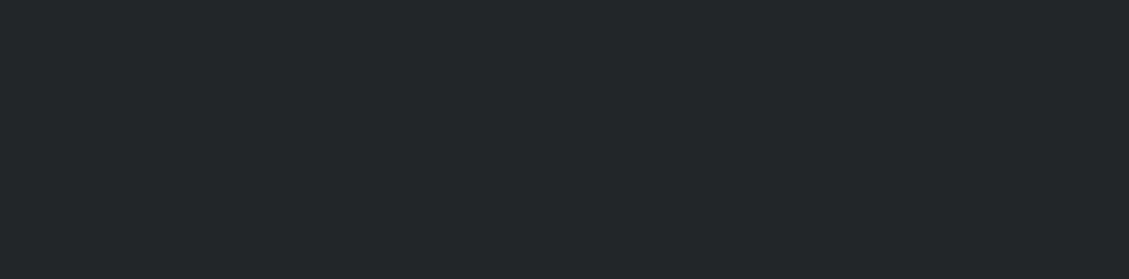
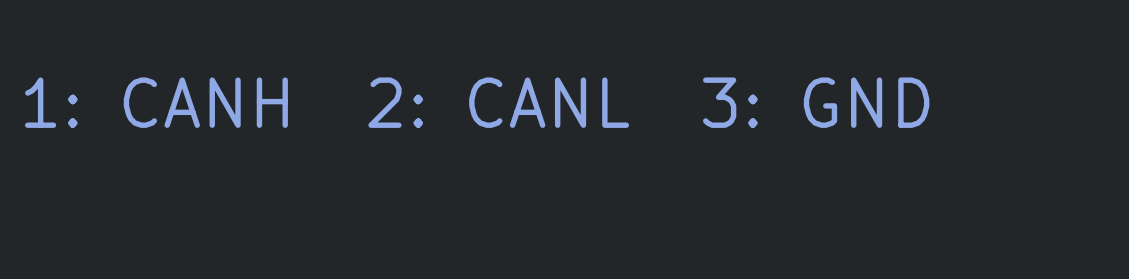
text: none -> 1: CANH 2: CANL 3: GND (477, 102)

